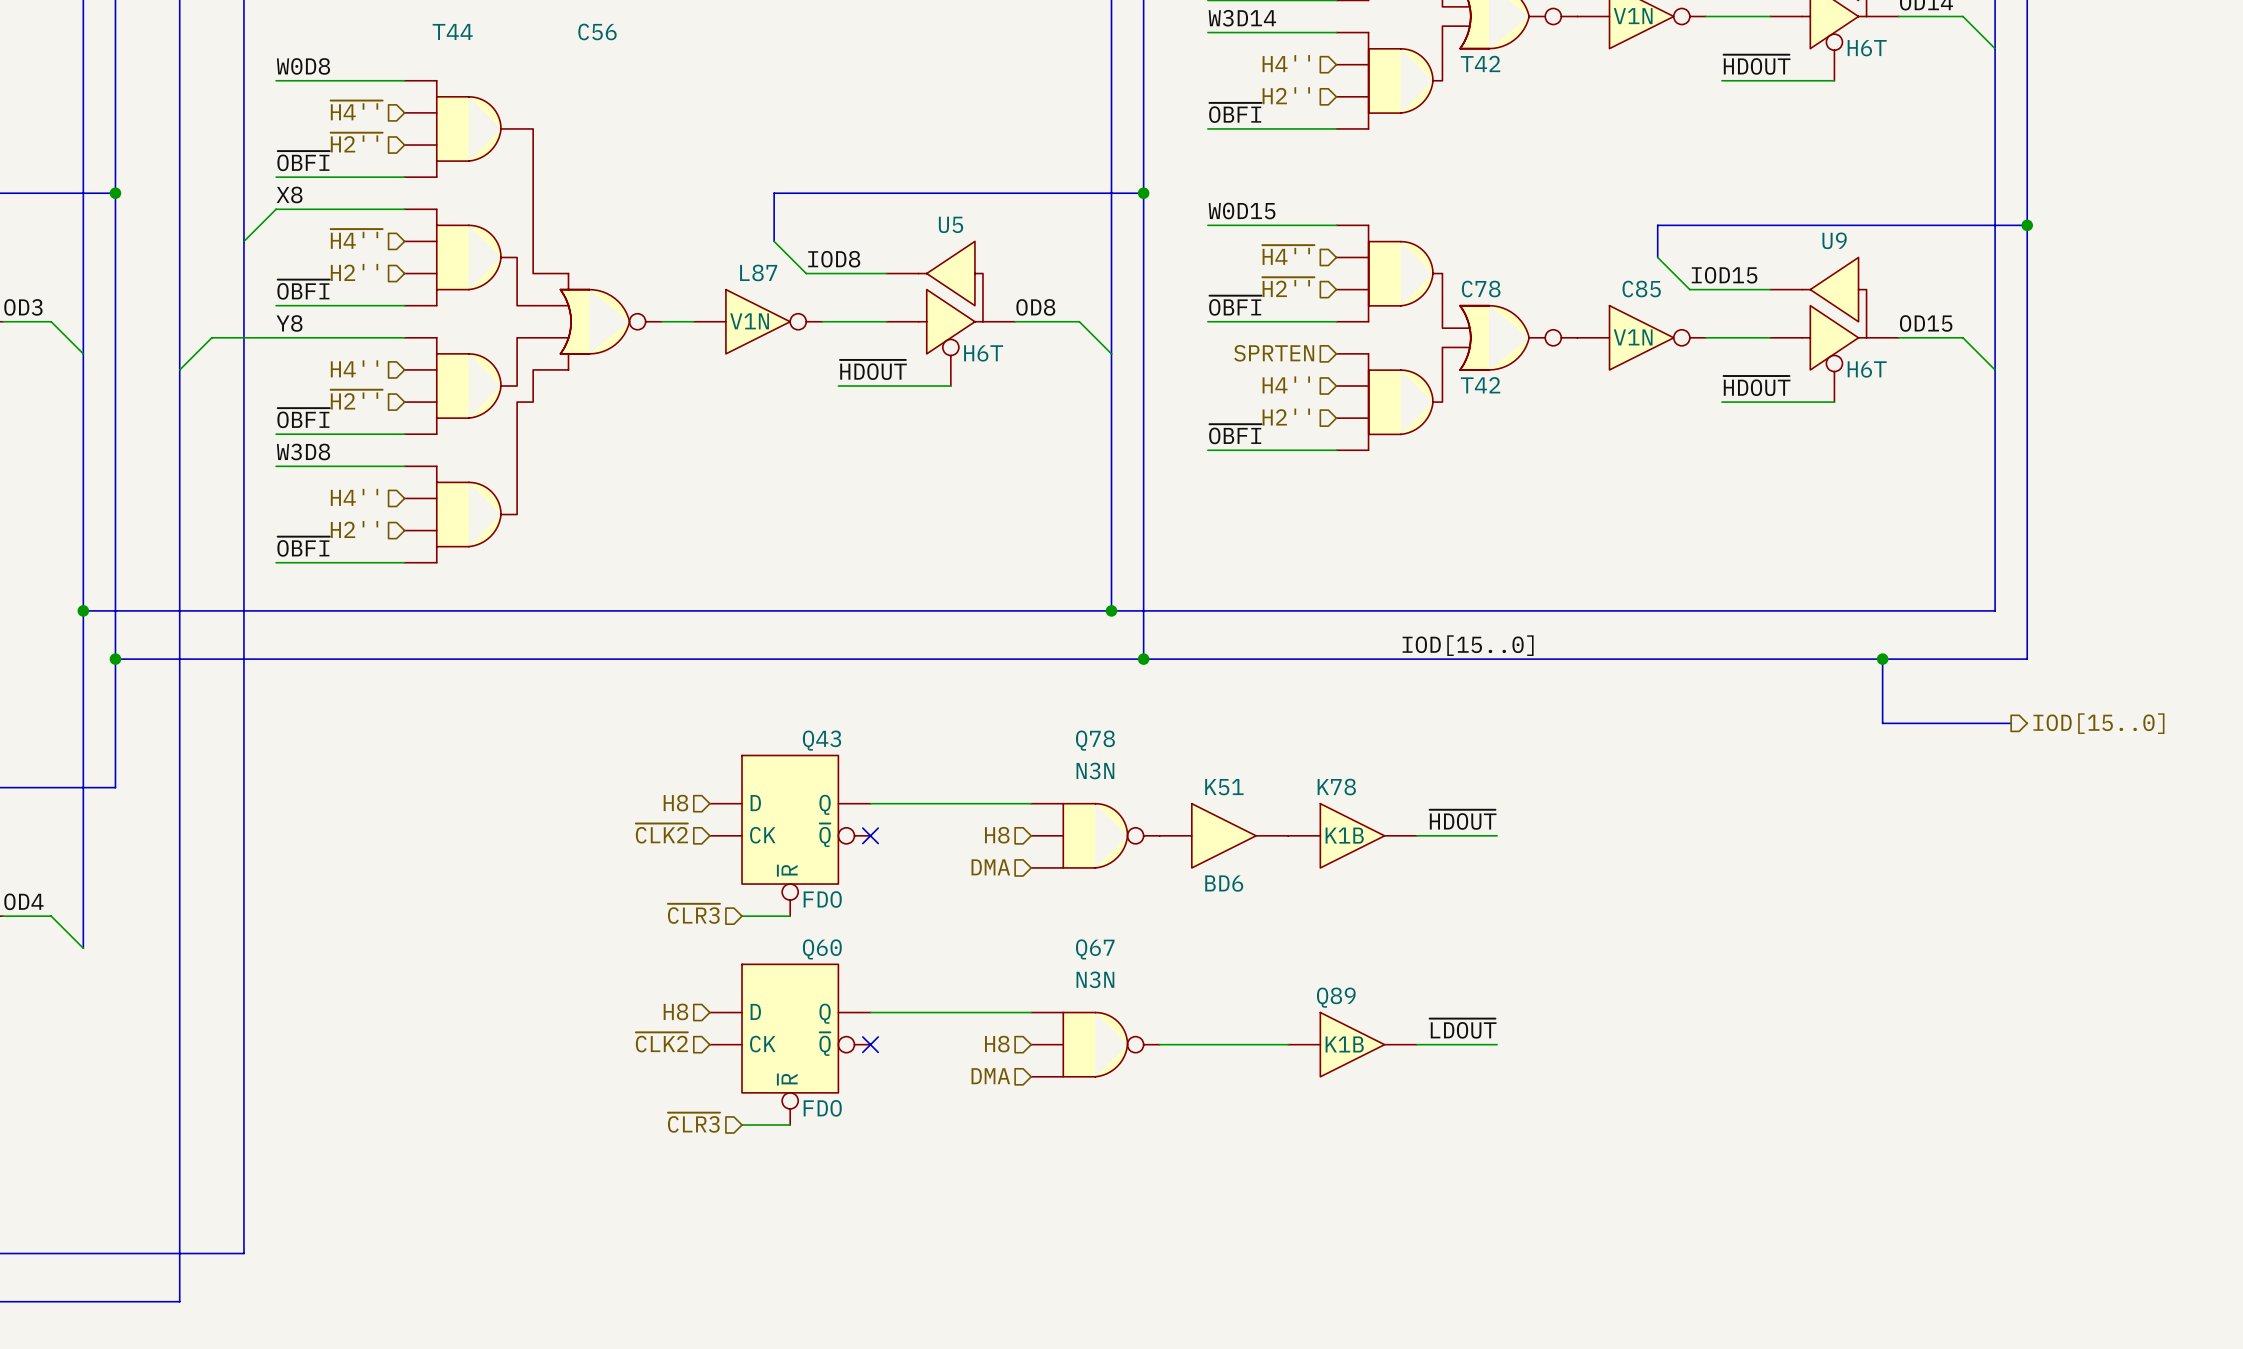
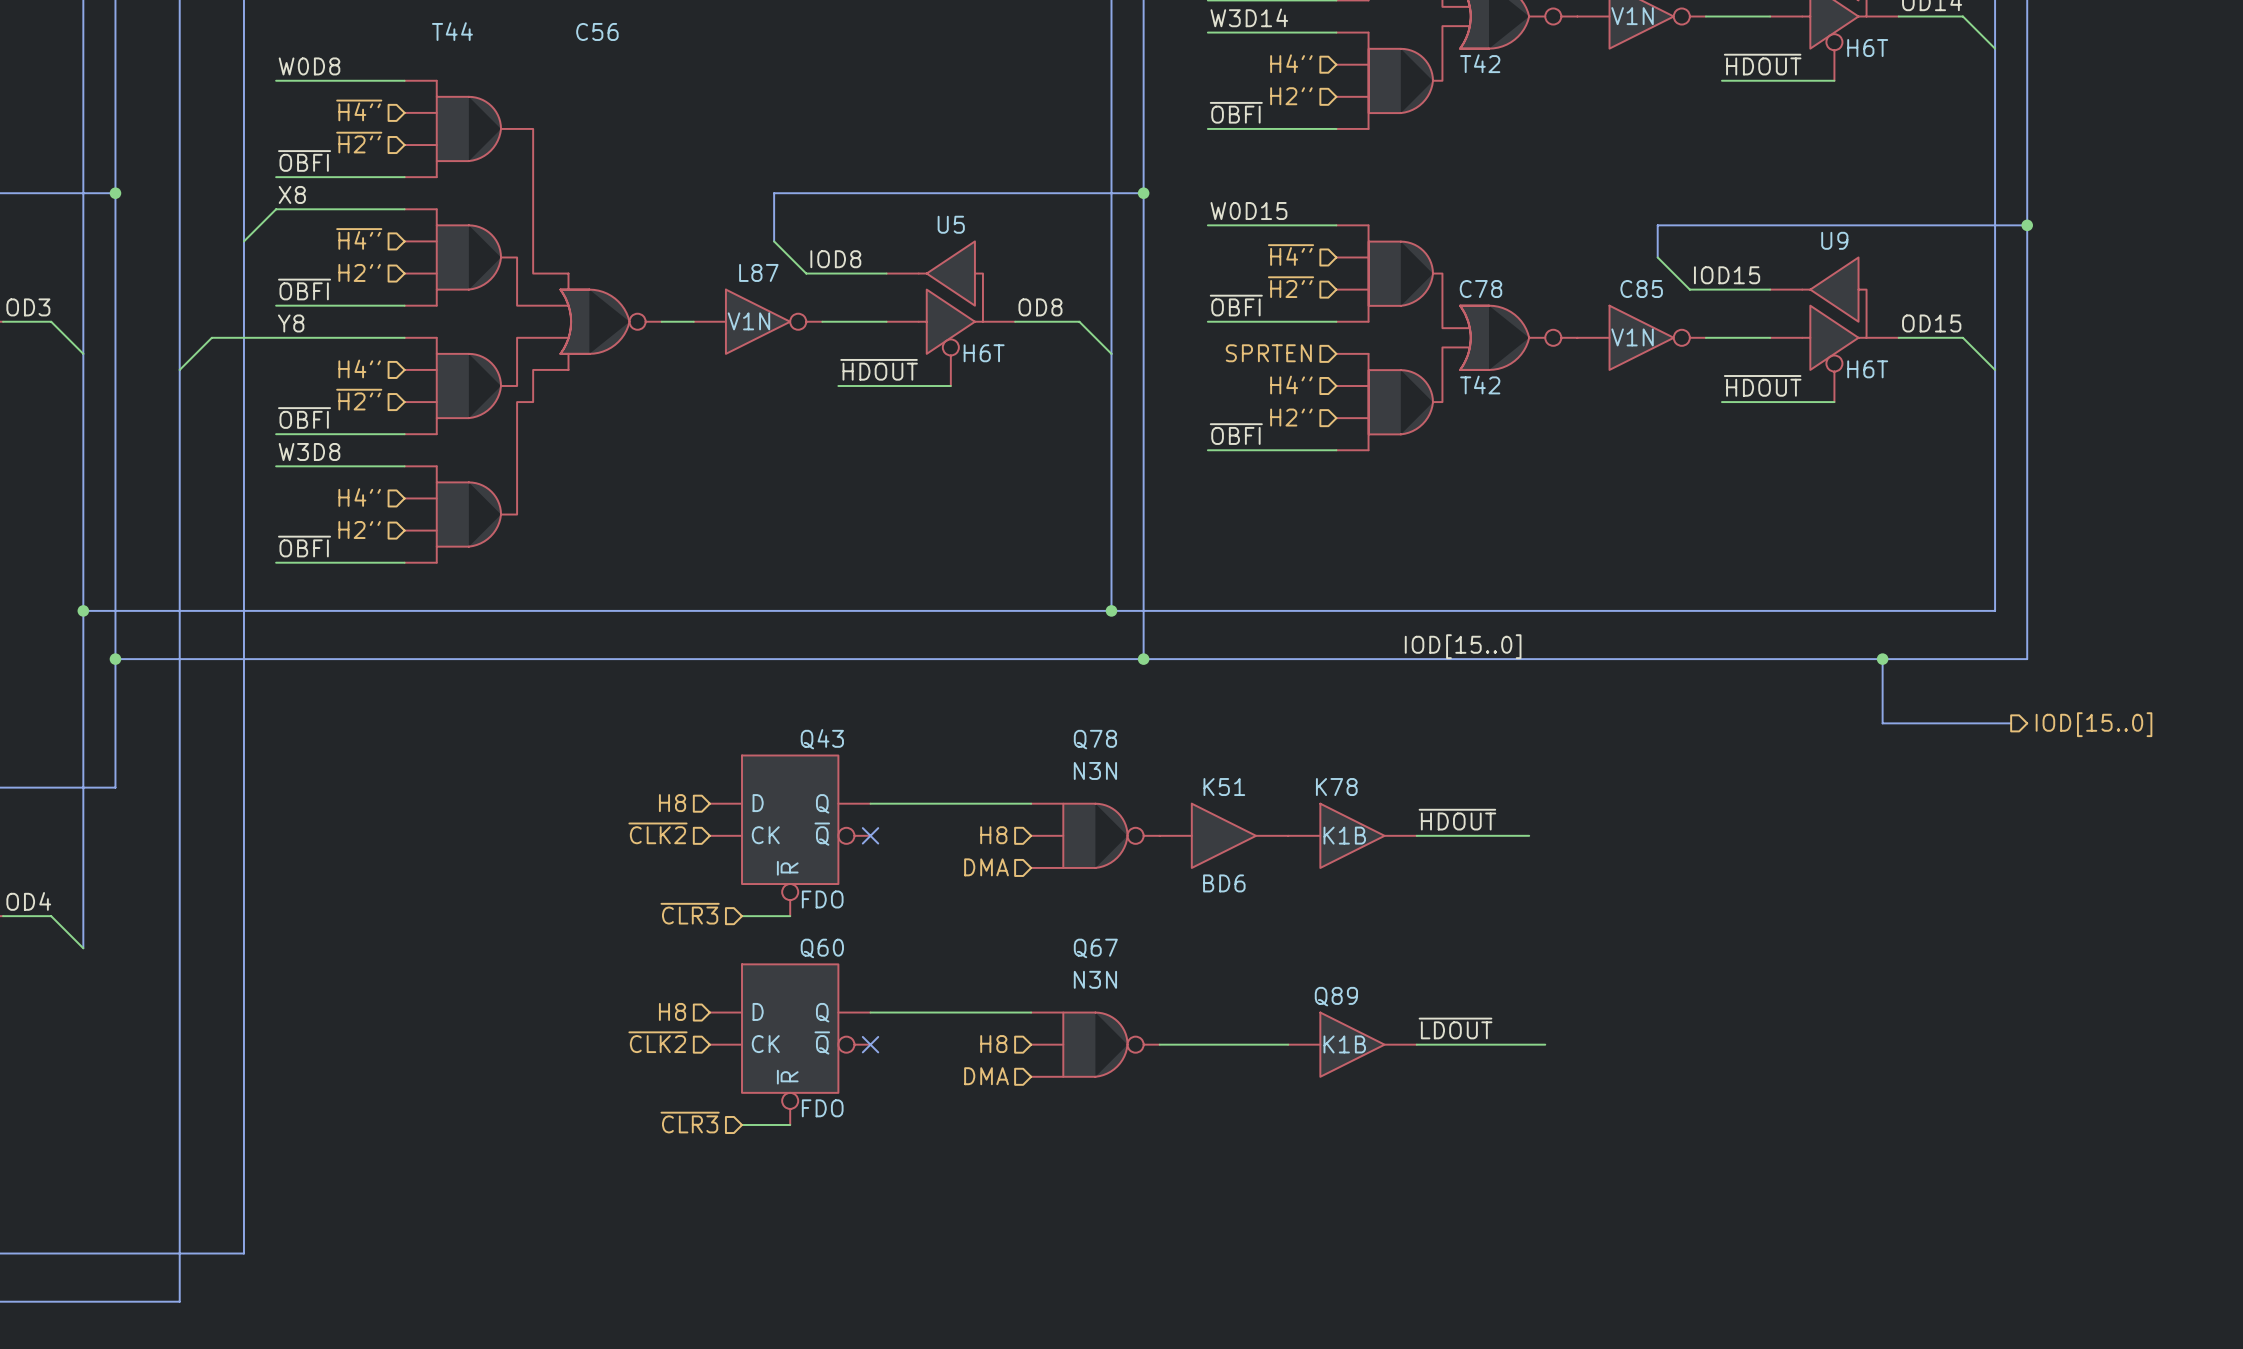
label position: ~{HDOUT} (1463, 819) -> ~{HDOUT} (1457, 819)
wire: none -> (1497, 835) (1529, 835)
label position: ~{LDOUT} (1463, 1028) -> ~{LDOUT} (1455, 1028)
wire: none -> (1497, 1044) (1545, 1044)

